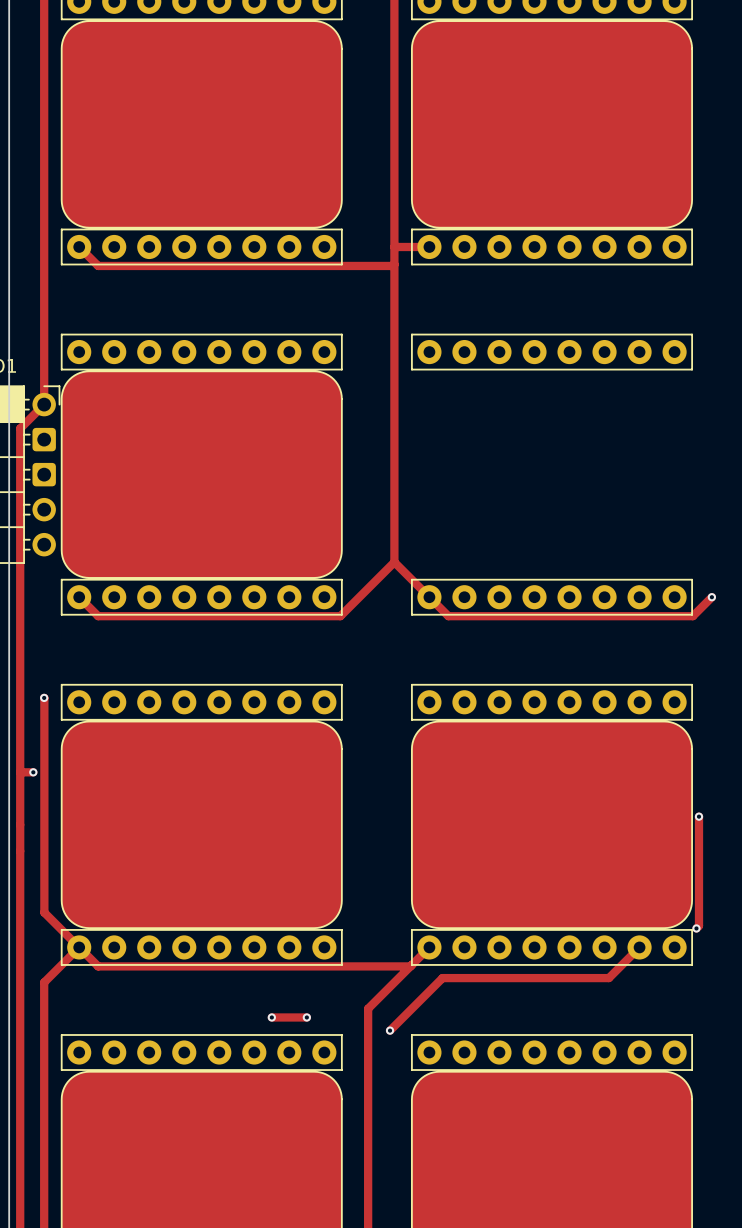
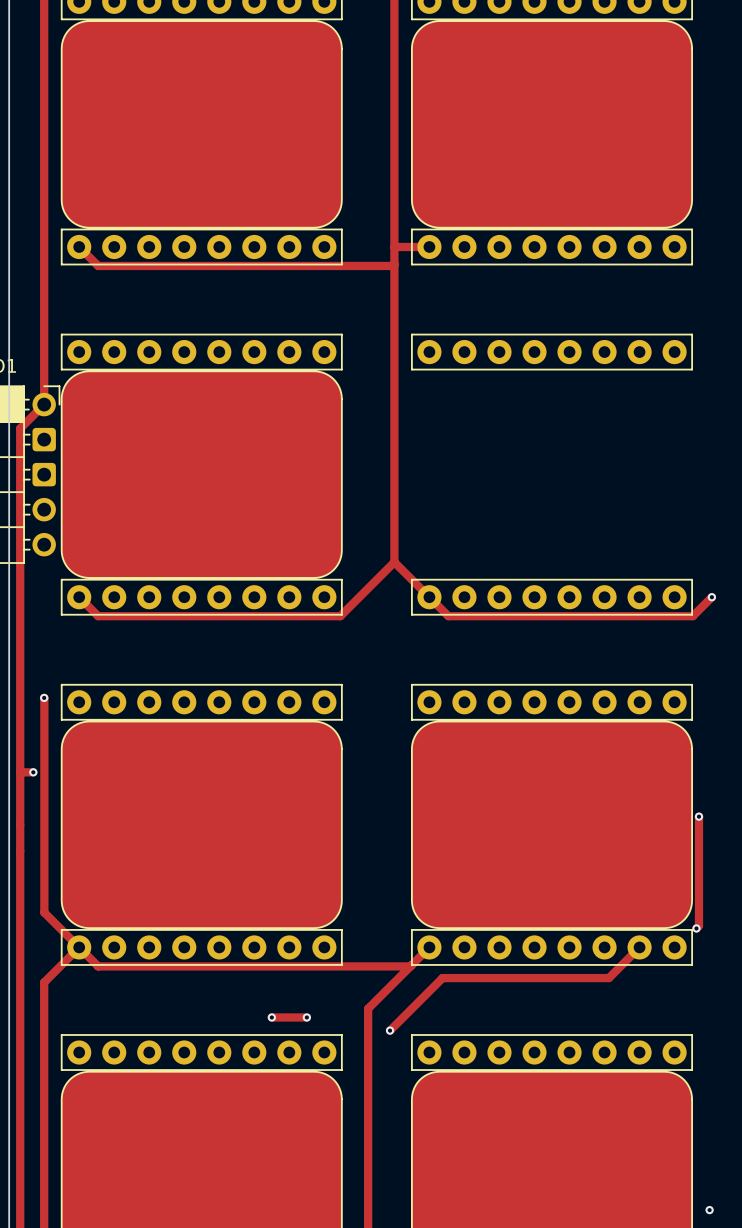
via: none -> (709, 1210)

